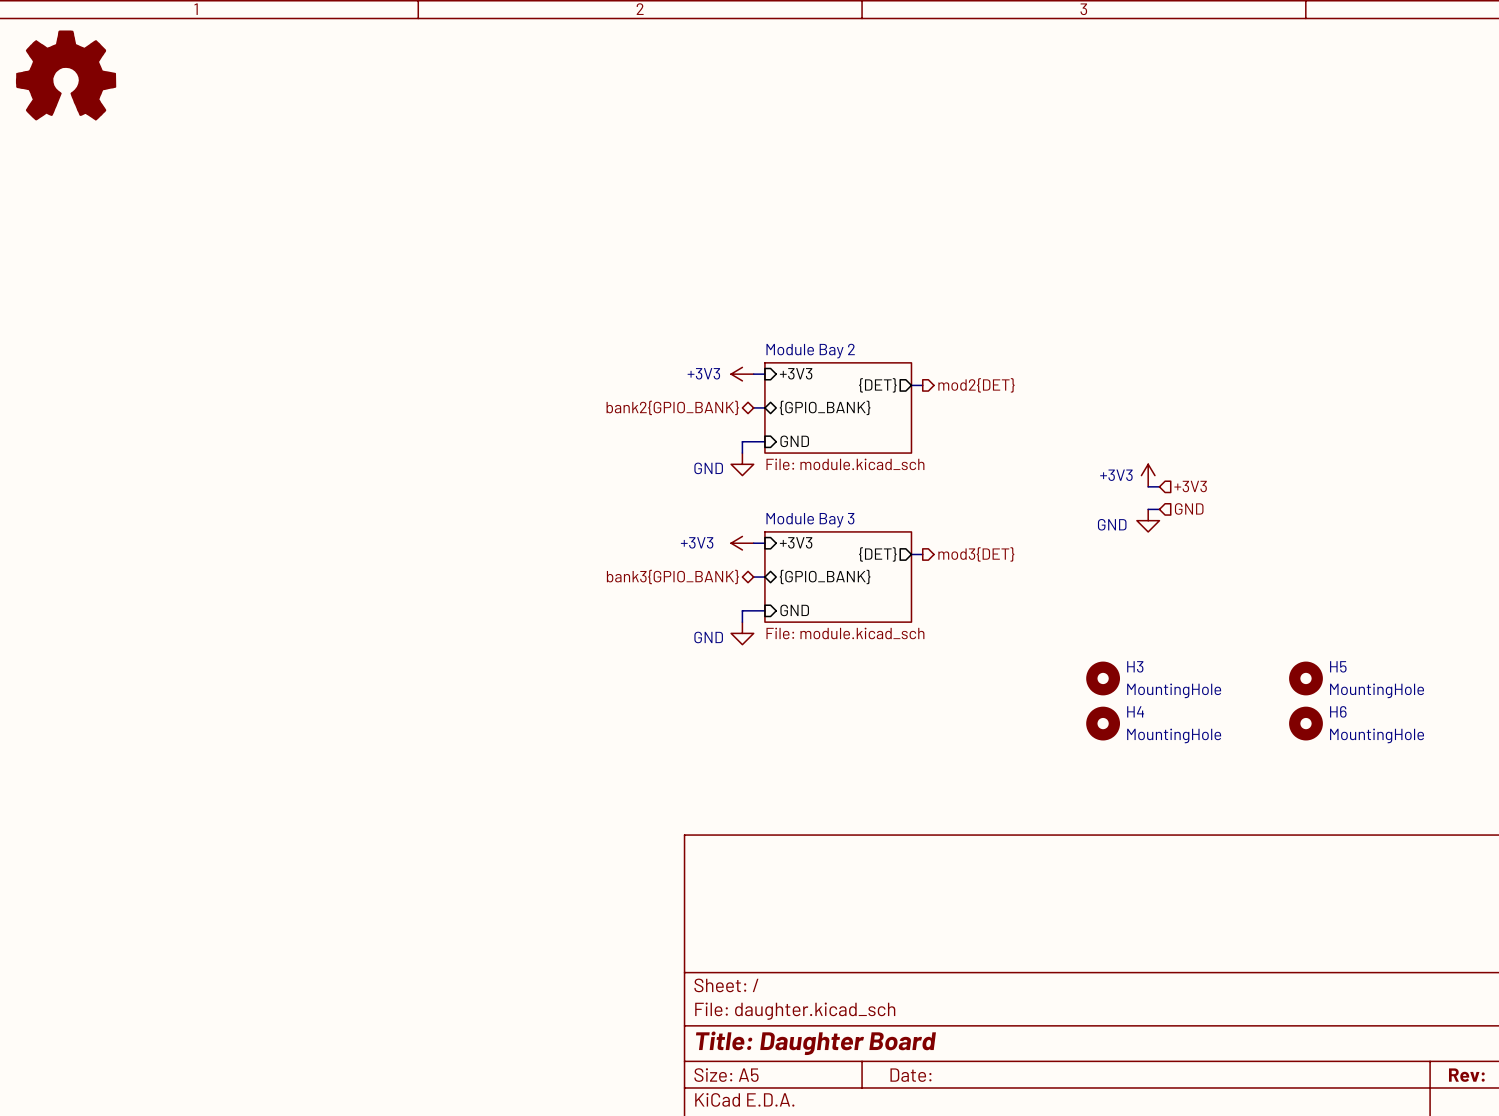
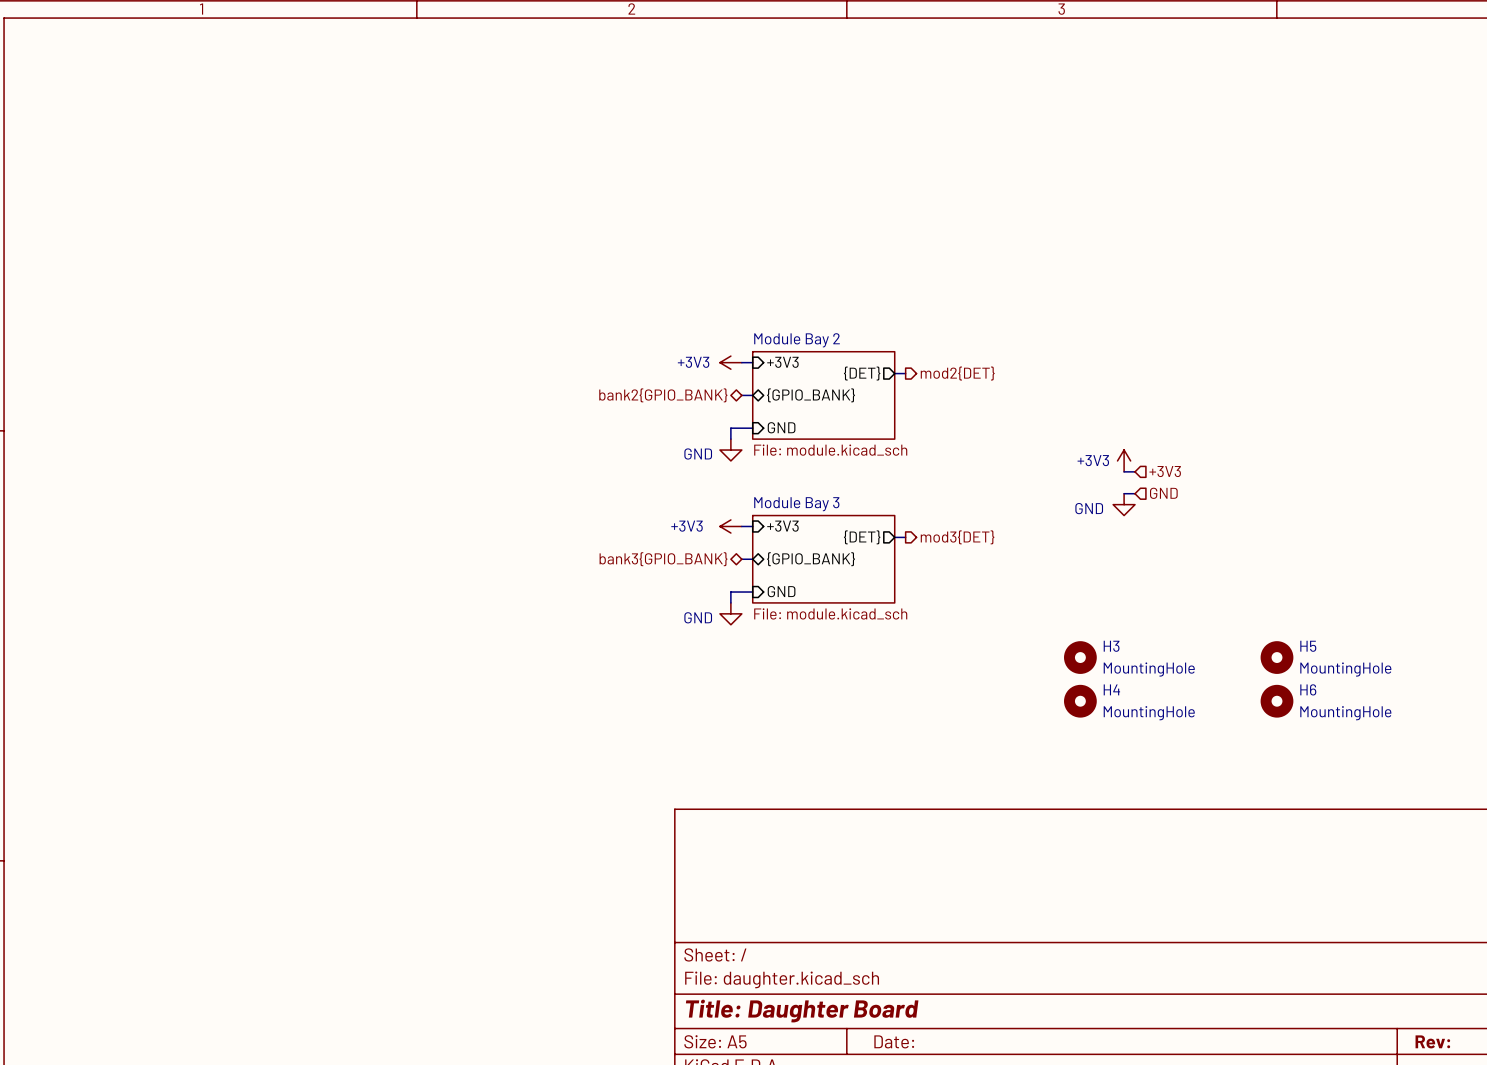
part: (66, 75) -> none

